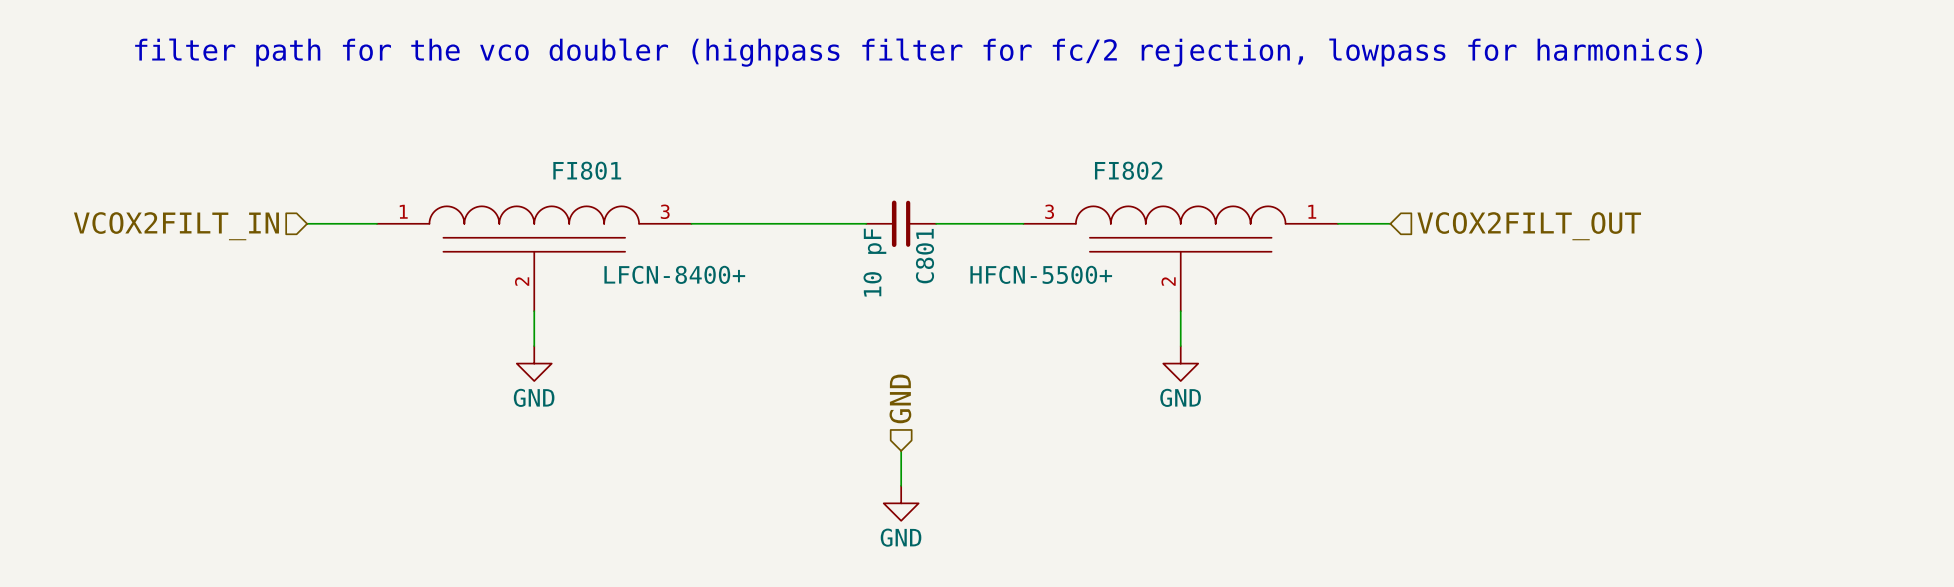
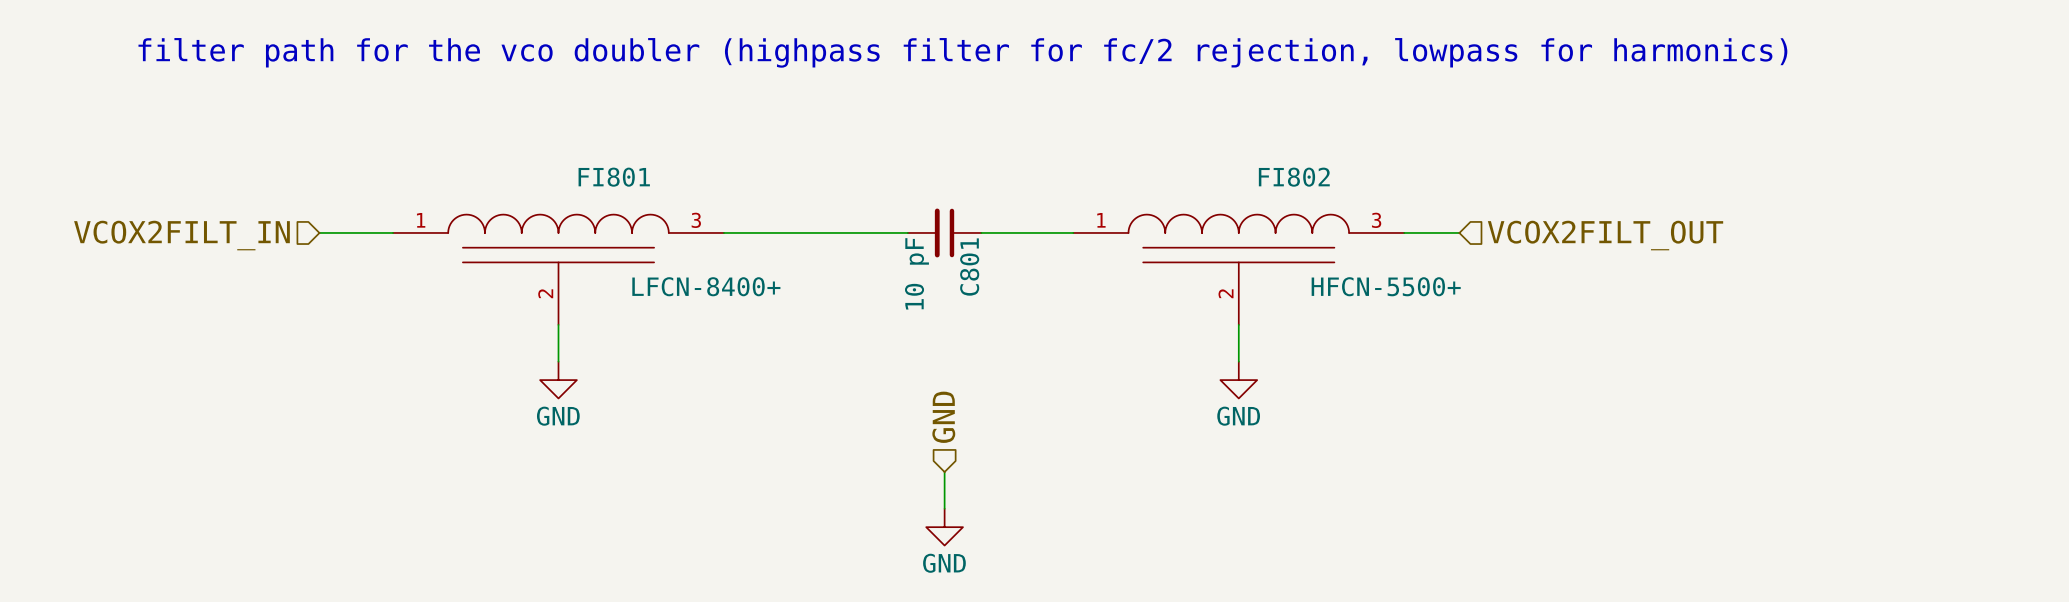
FI802 flip: as is (1180, 229) -> left-right (1238, 238)

